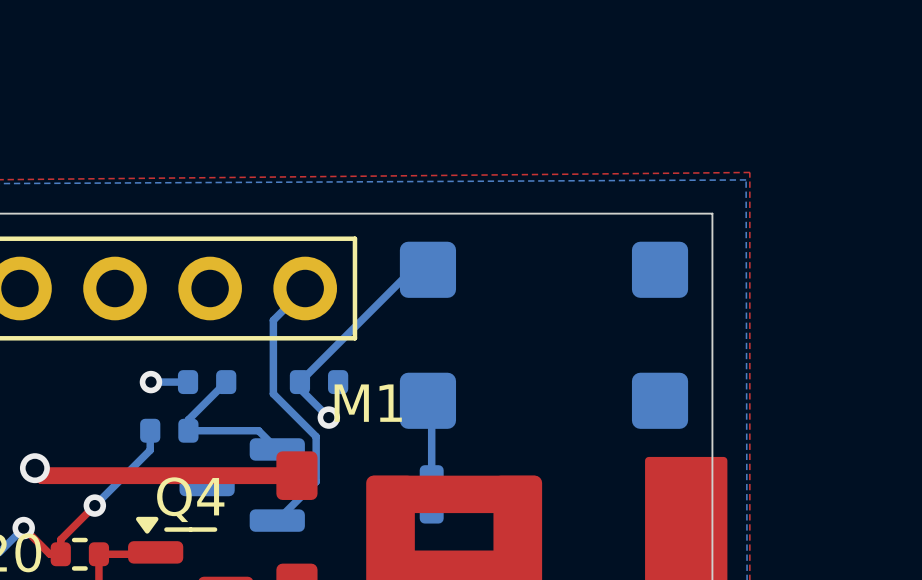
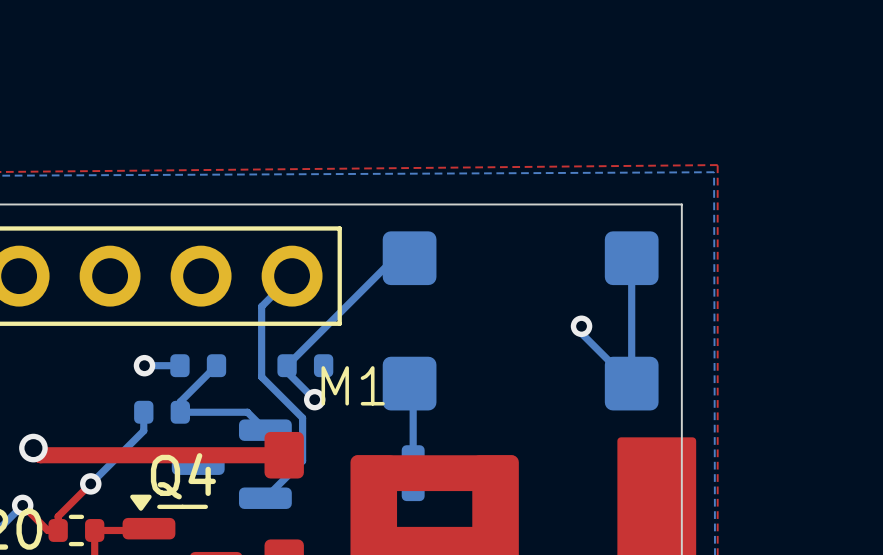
bottom track: none -> (631, 258) (631, 383) (581, 333) (581, 326)
via: none -> (581, 326)

